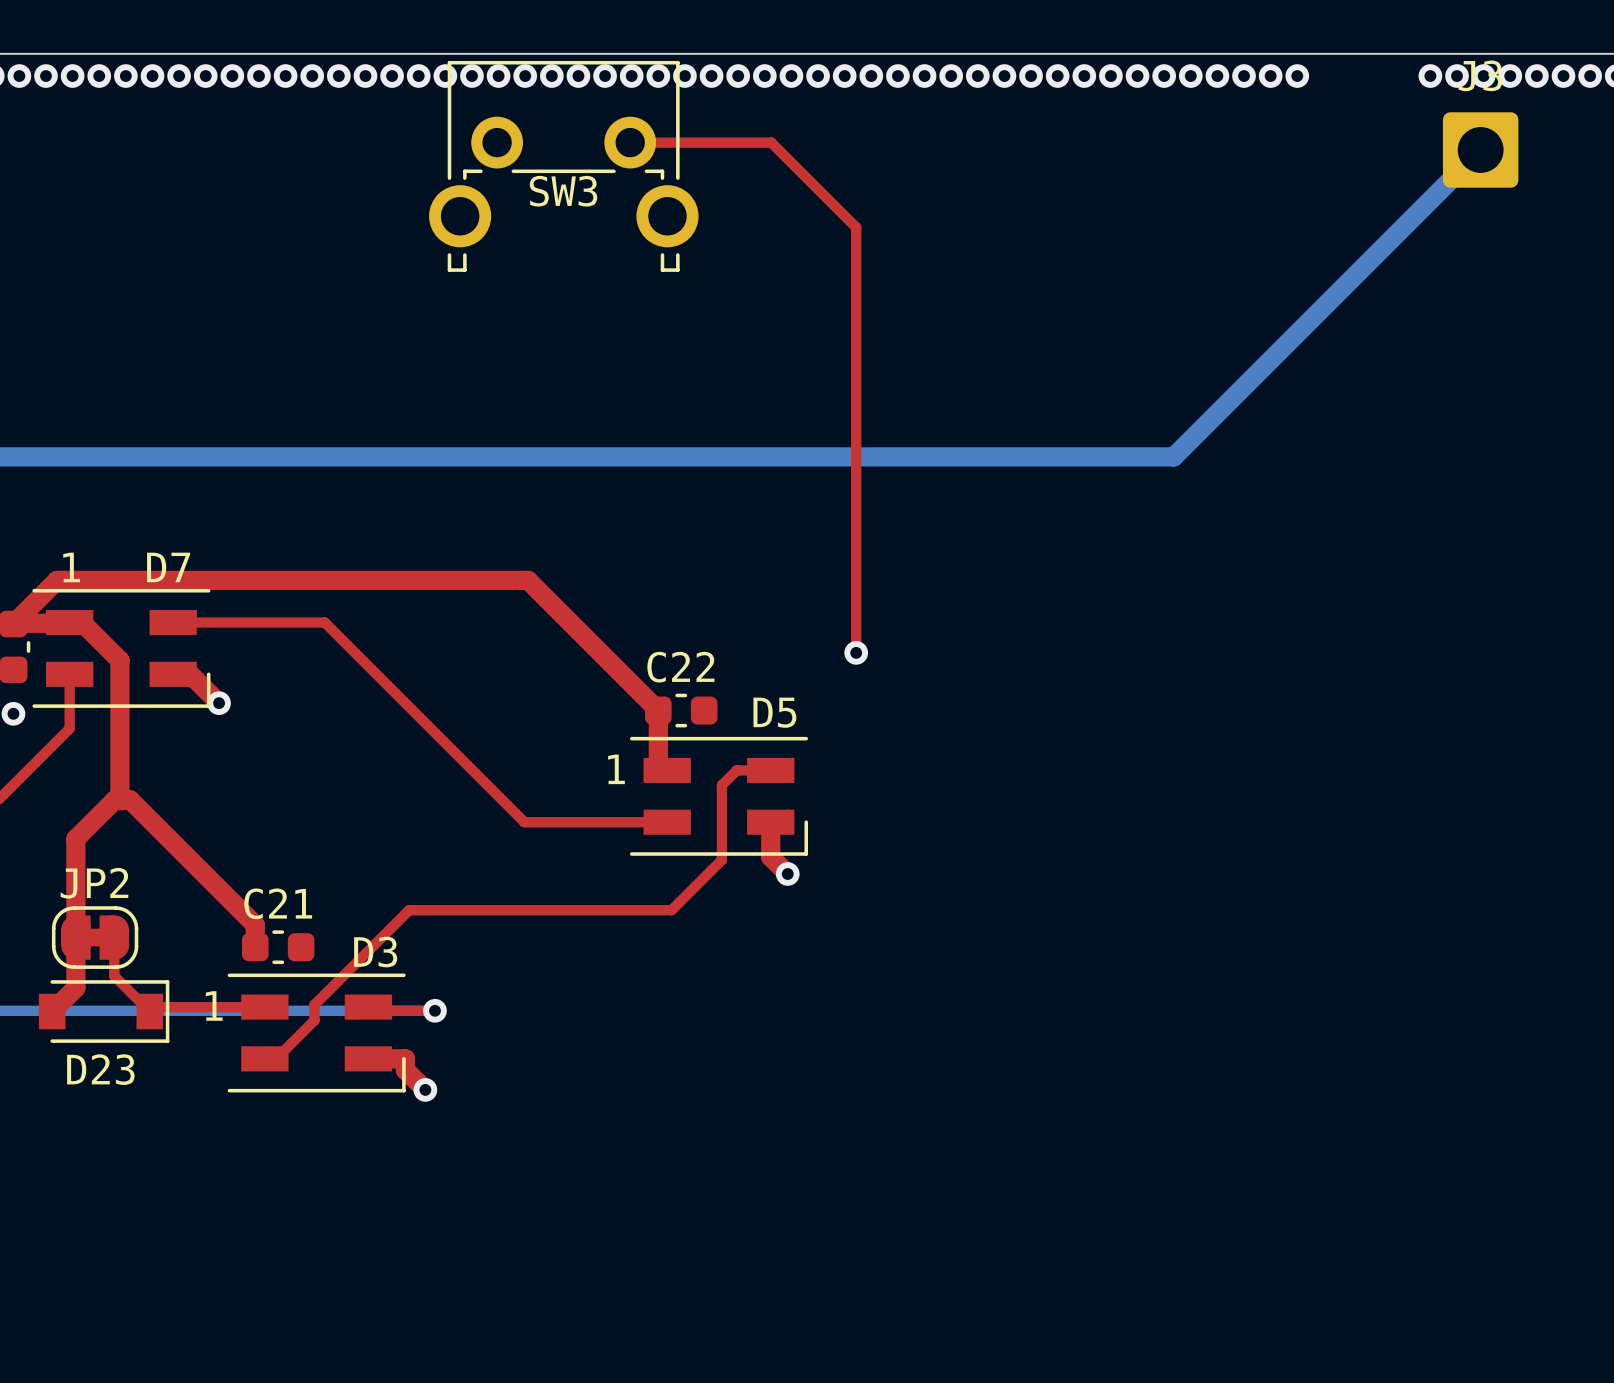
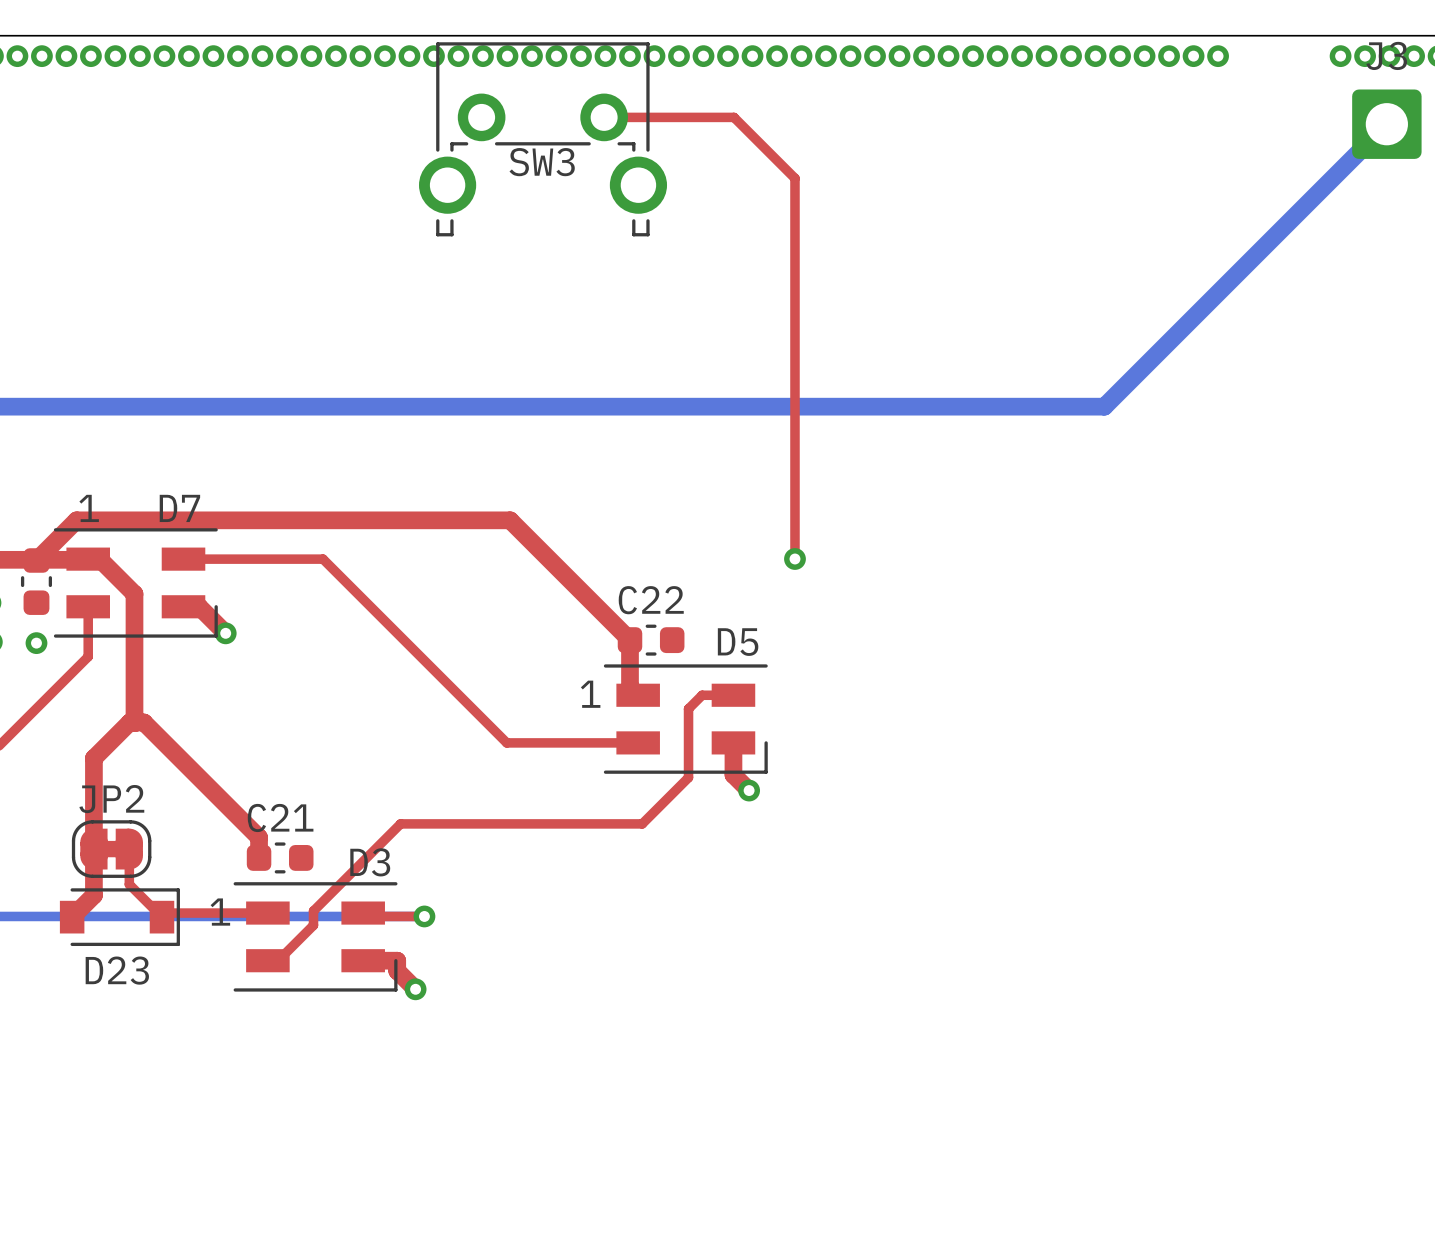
top track: (837, 208) (856, 227) (856, 652) -> (794, 178) (794, 559)
via position: (856, 652) -> (794, 558)

